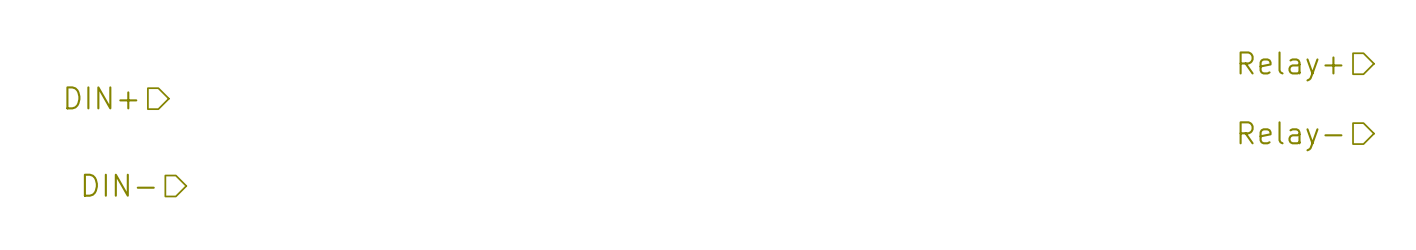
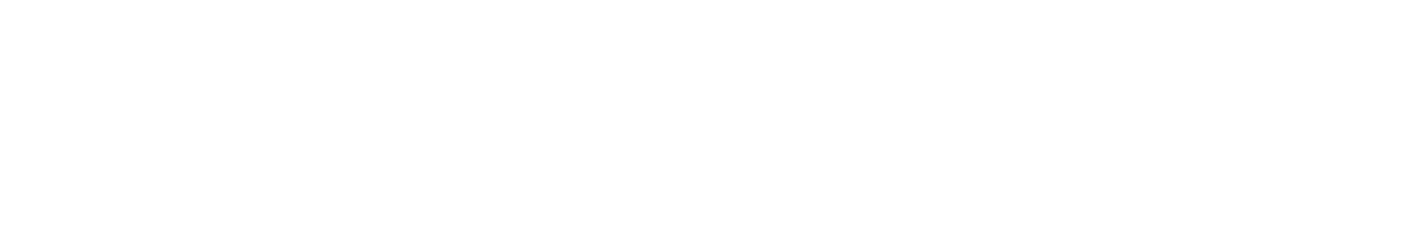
hierarchical label: Relay+ (1291, 66) -> none
hierarchical label: DIN+ (101, 97) -> none
hierarchical label: Relay- (1291, 136) -> none
hierarchical label: DIN- (119, 185) -> none

